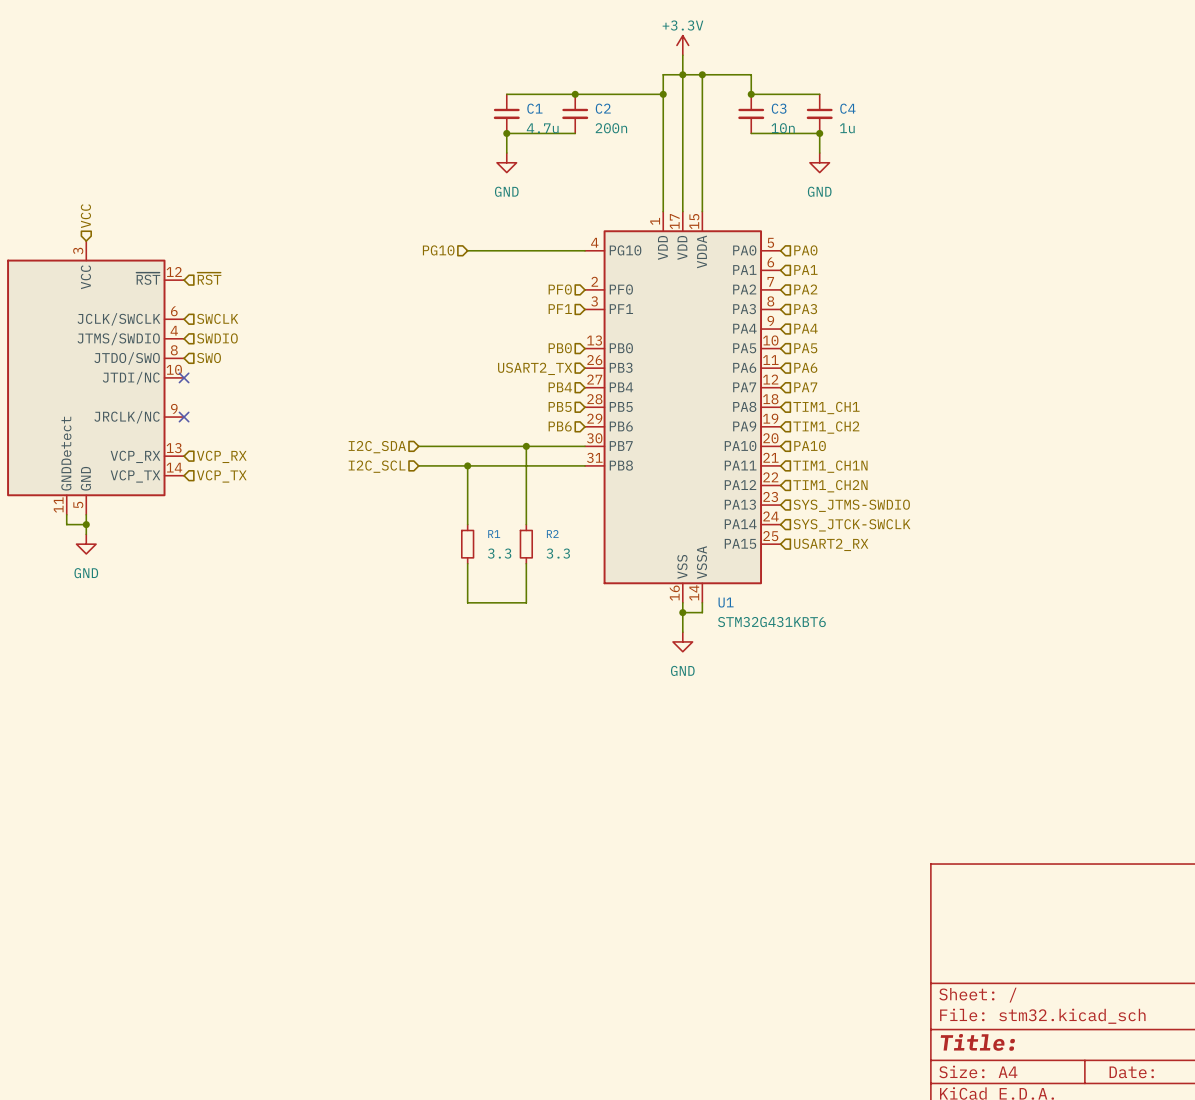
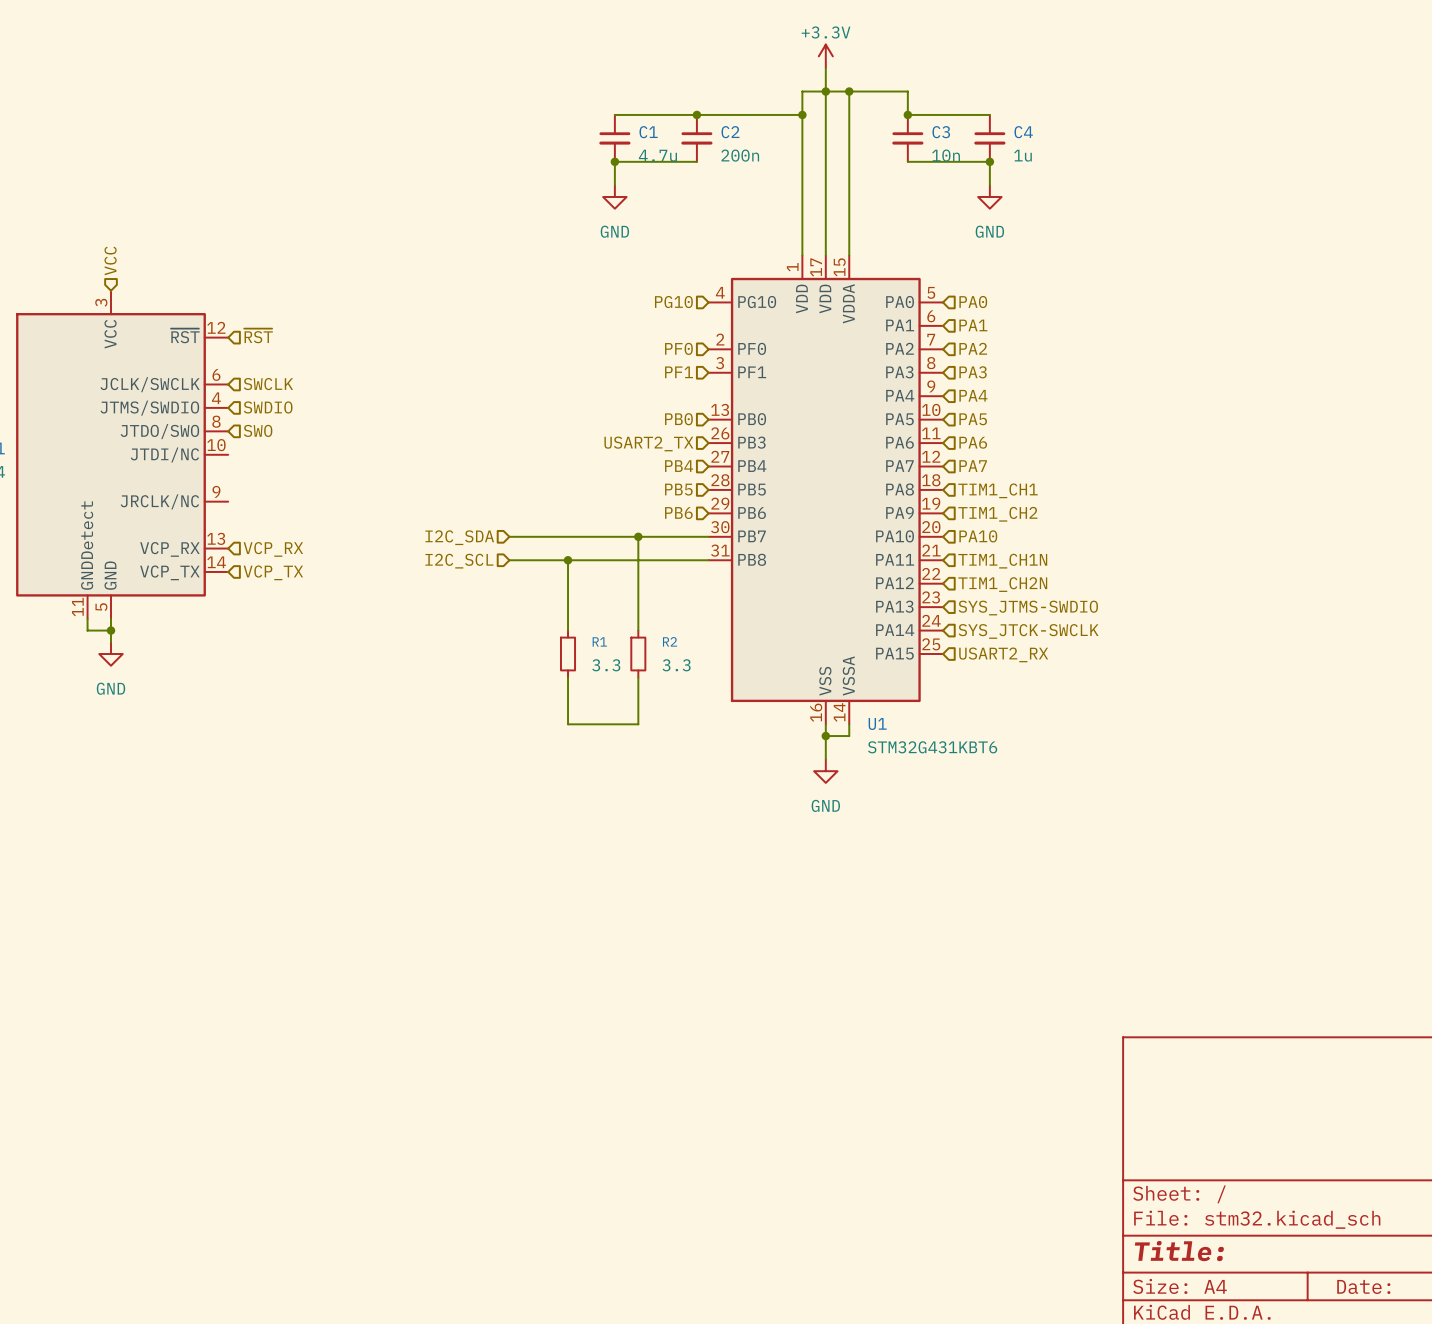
hierarchical label position: PG10 (438, 250) -> PG10 (673, 302)
wire: (467, 250) (585, 250) -> none
no-connect mark: (184, 377) -> none
no-connect mark: (184, 417) -> none

